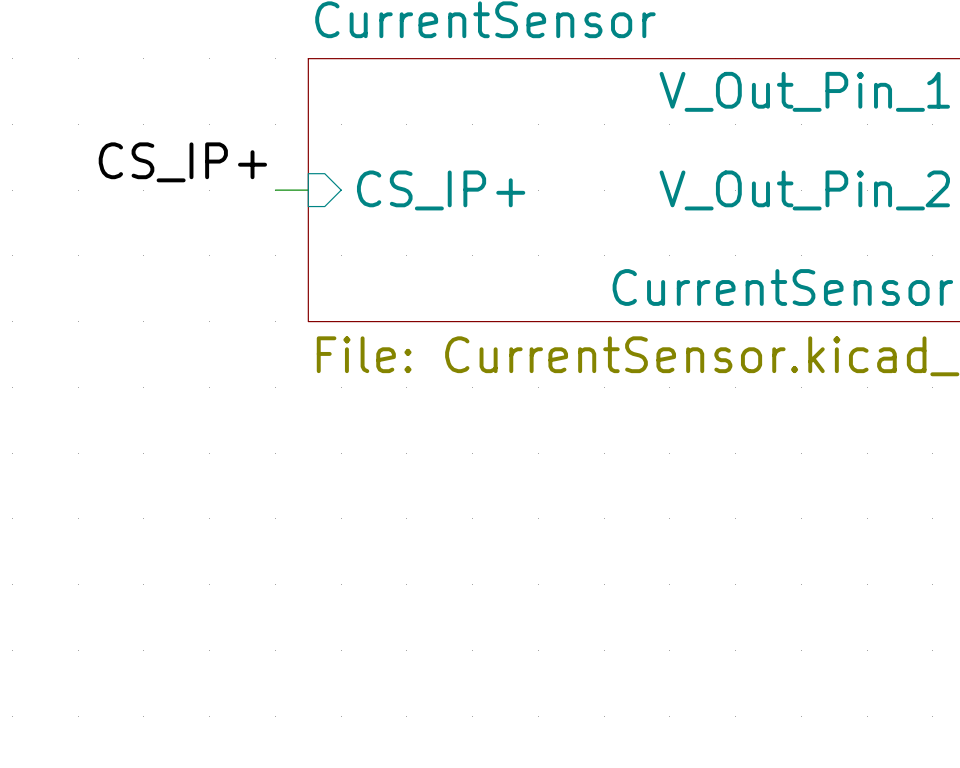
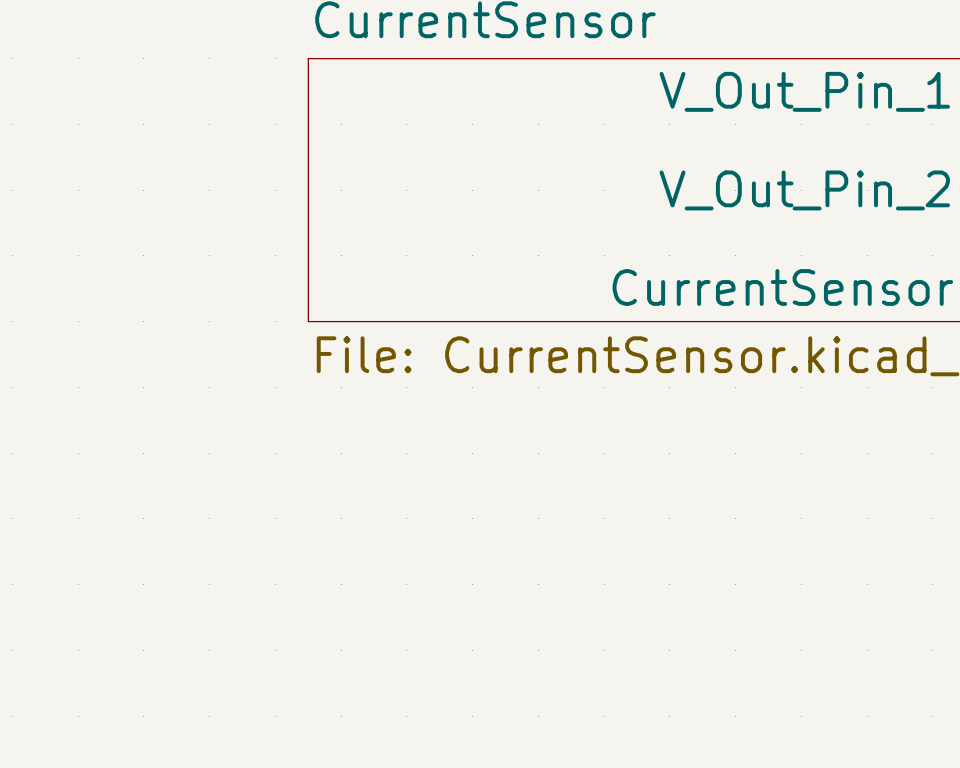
label: CS_IP+ (182, 162) -> none
wire: (275, 190) (308, 190) -> none
sheet pin: CS_IP+ (441, 190) -> none

